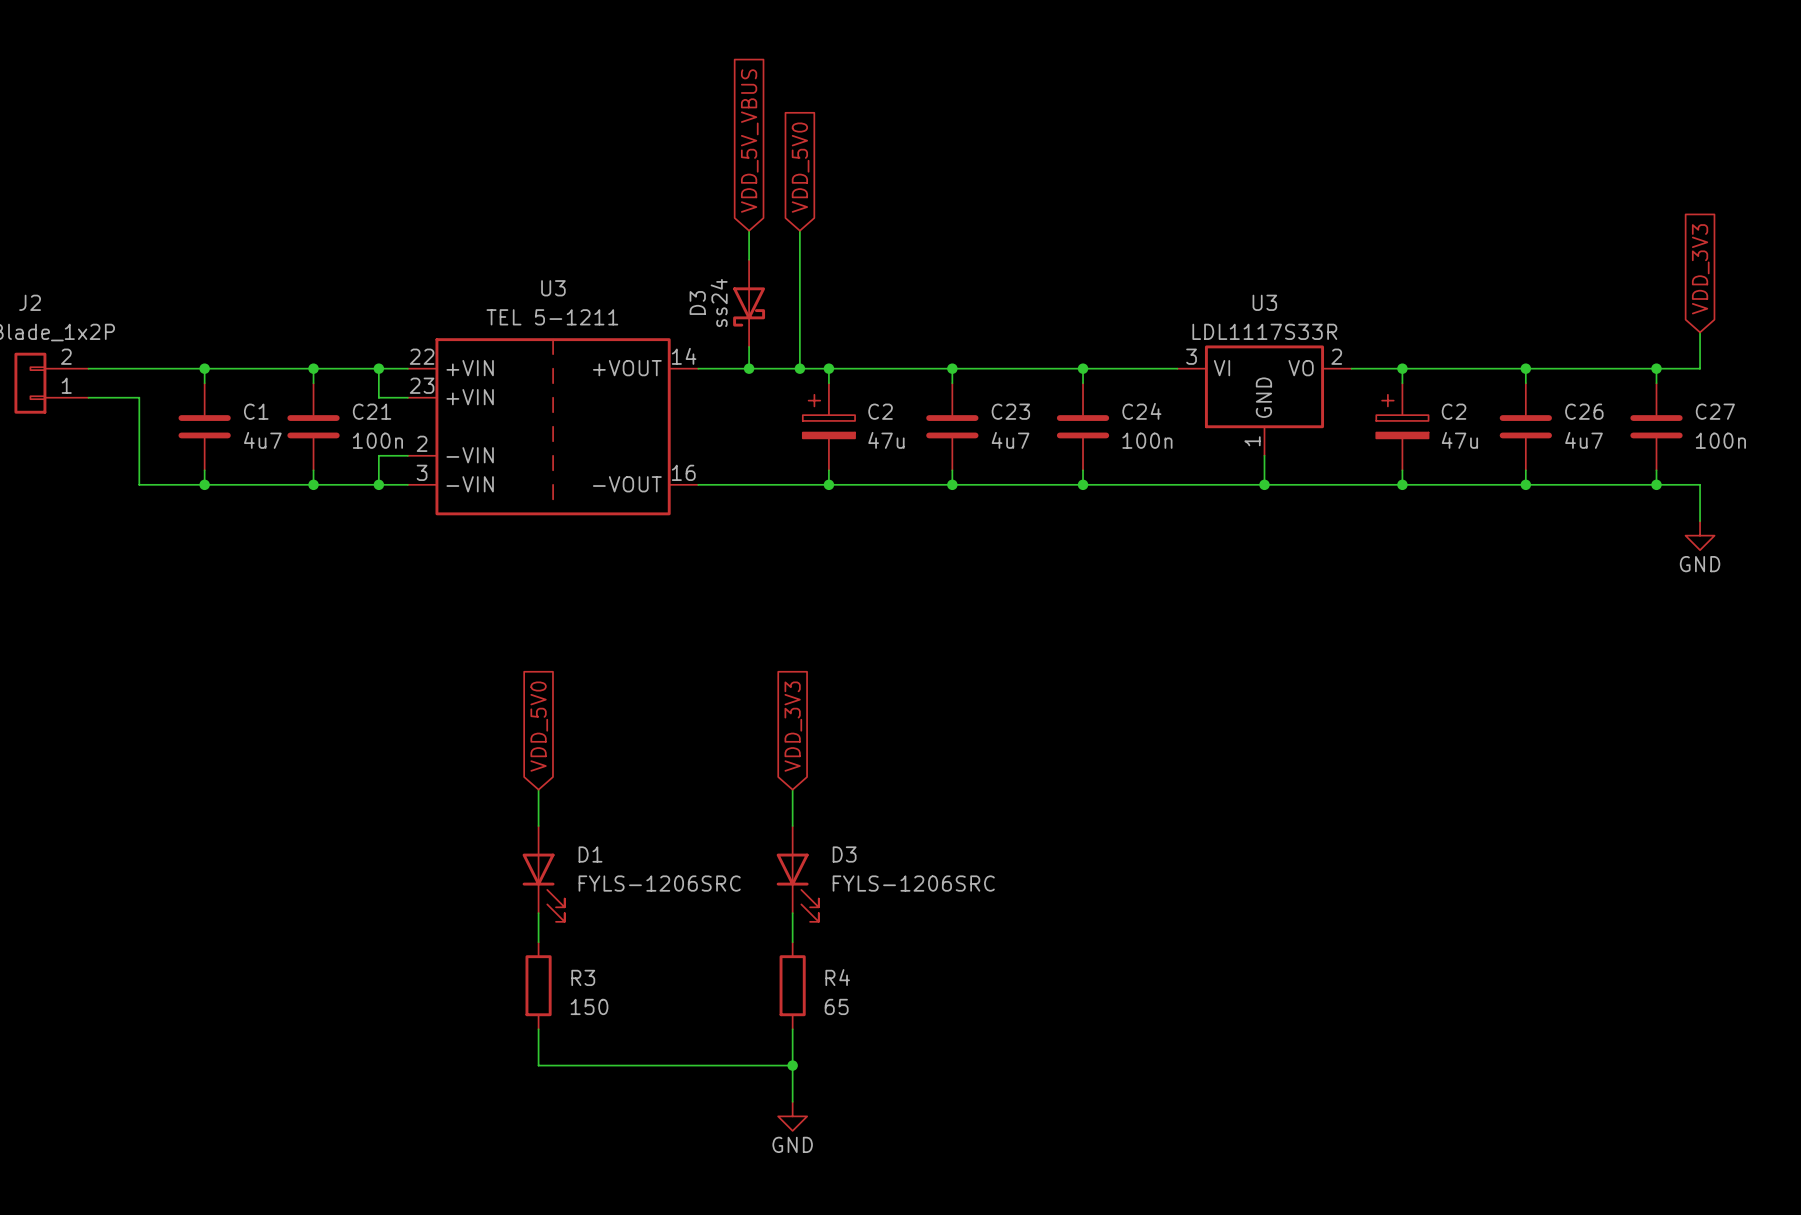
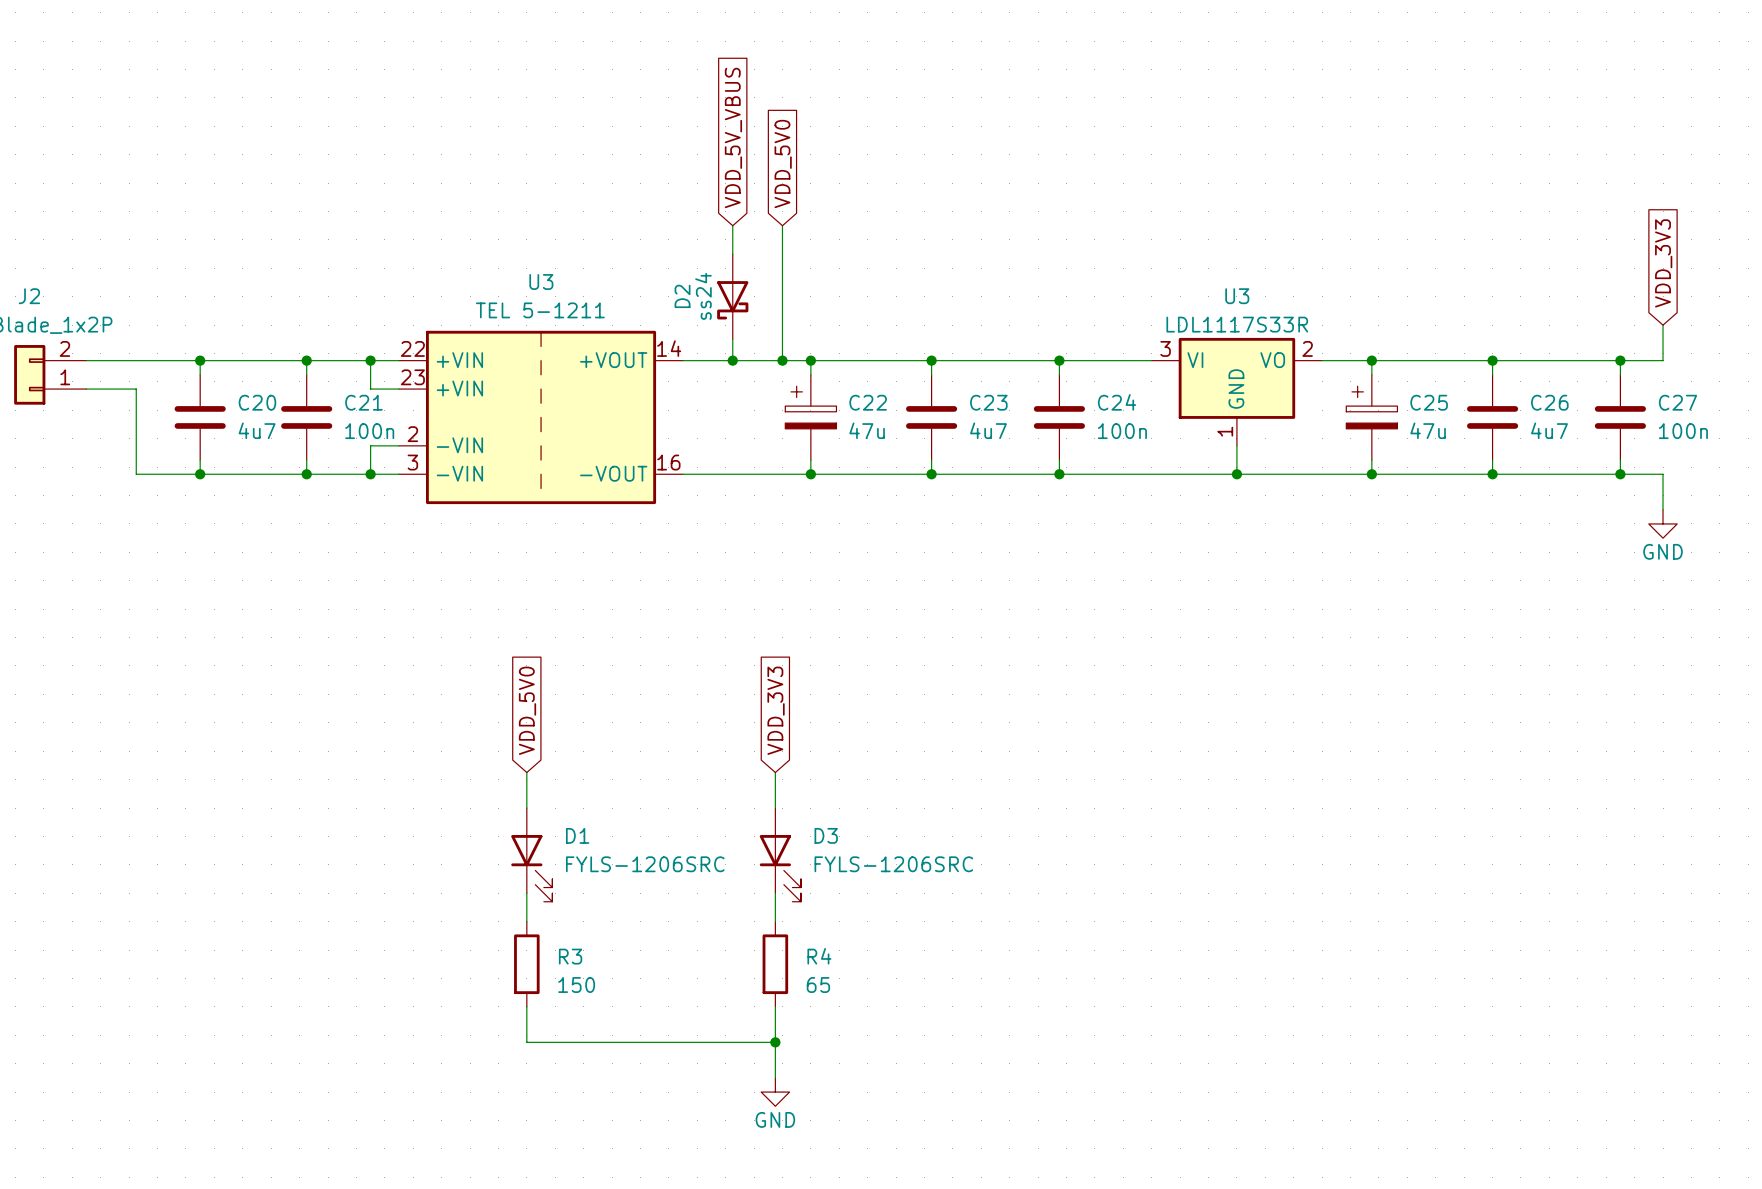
D3 name: D3 (697, 302) -> D2 (682, 296)
C1 name: C1 (256, 411) -> C20 (257, 402)
C2 name: C2 (880, 411) -> C22 (868, 402)
C2 name: C2 (1454, 411) -> C25 (1429, 402)

